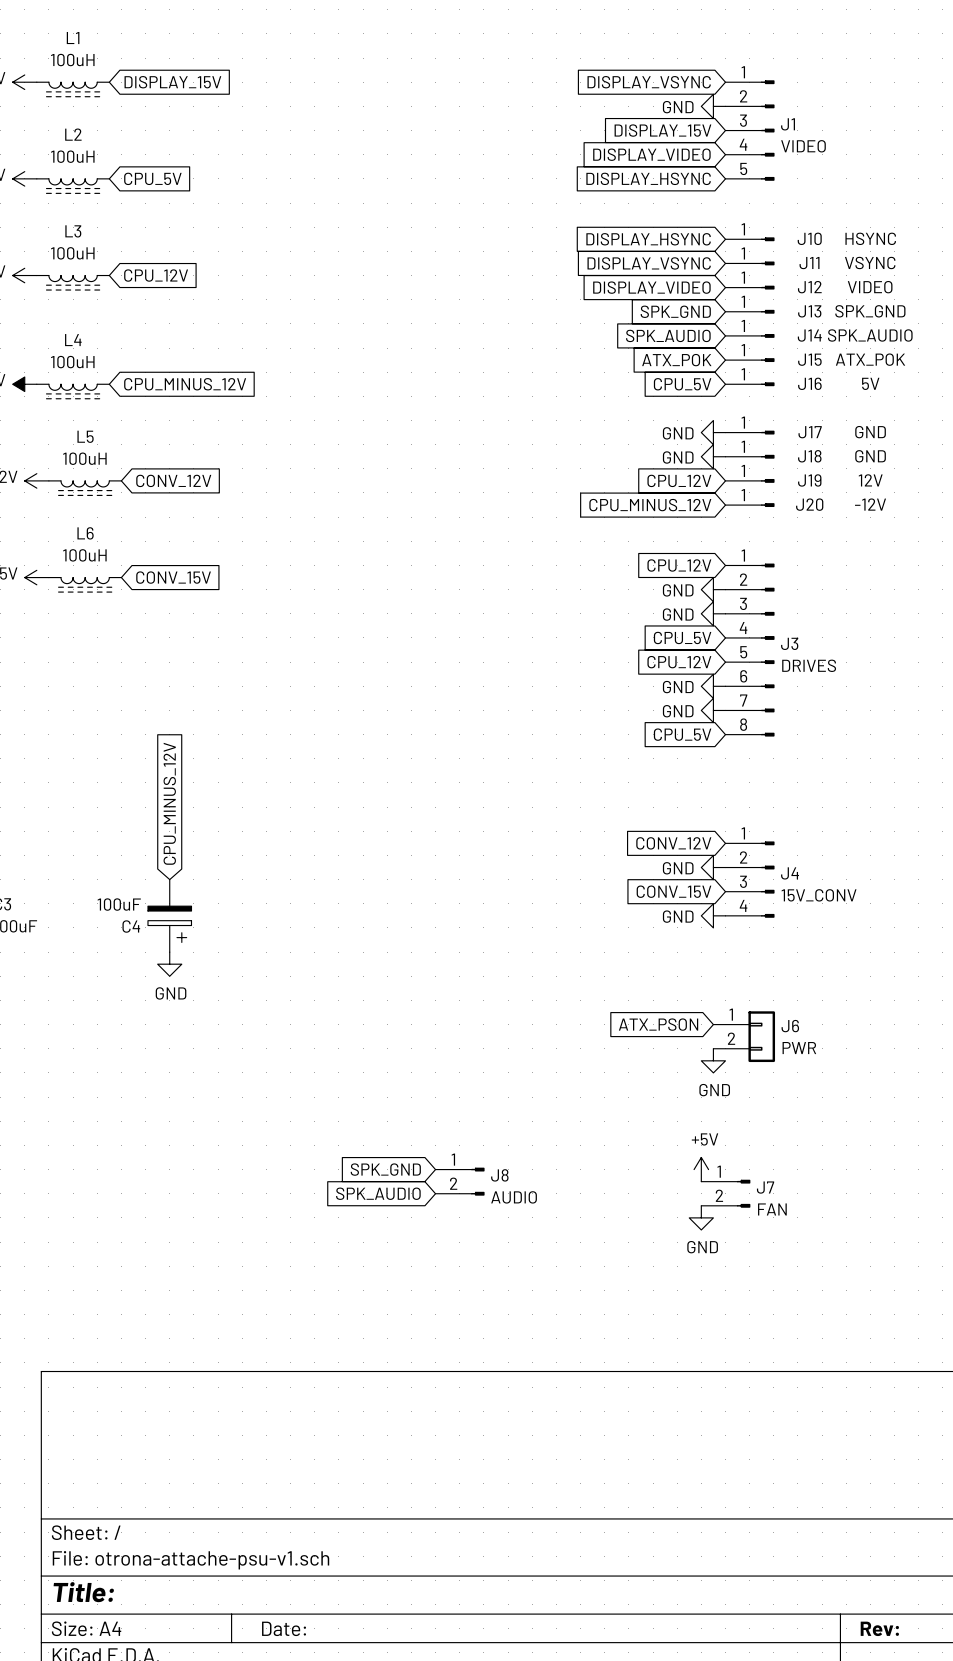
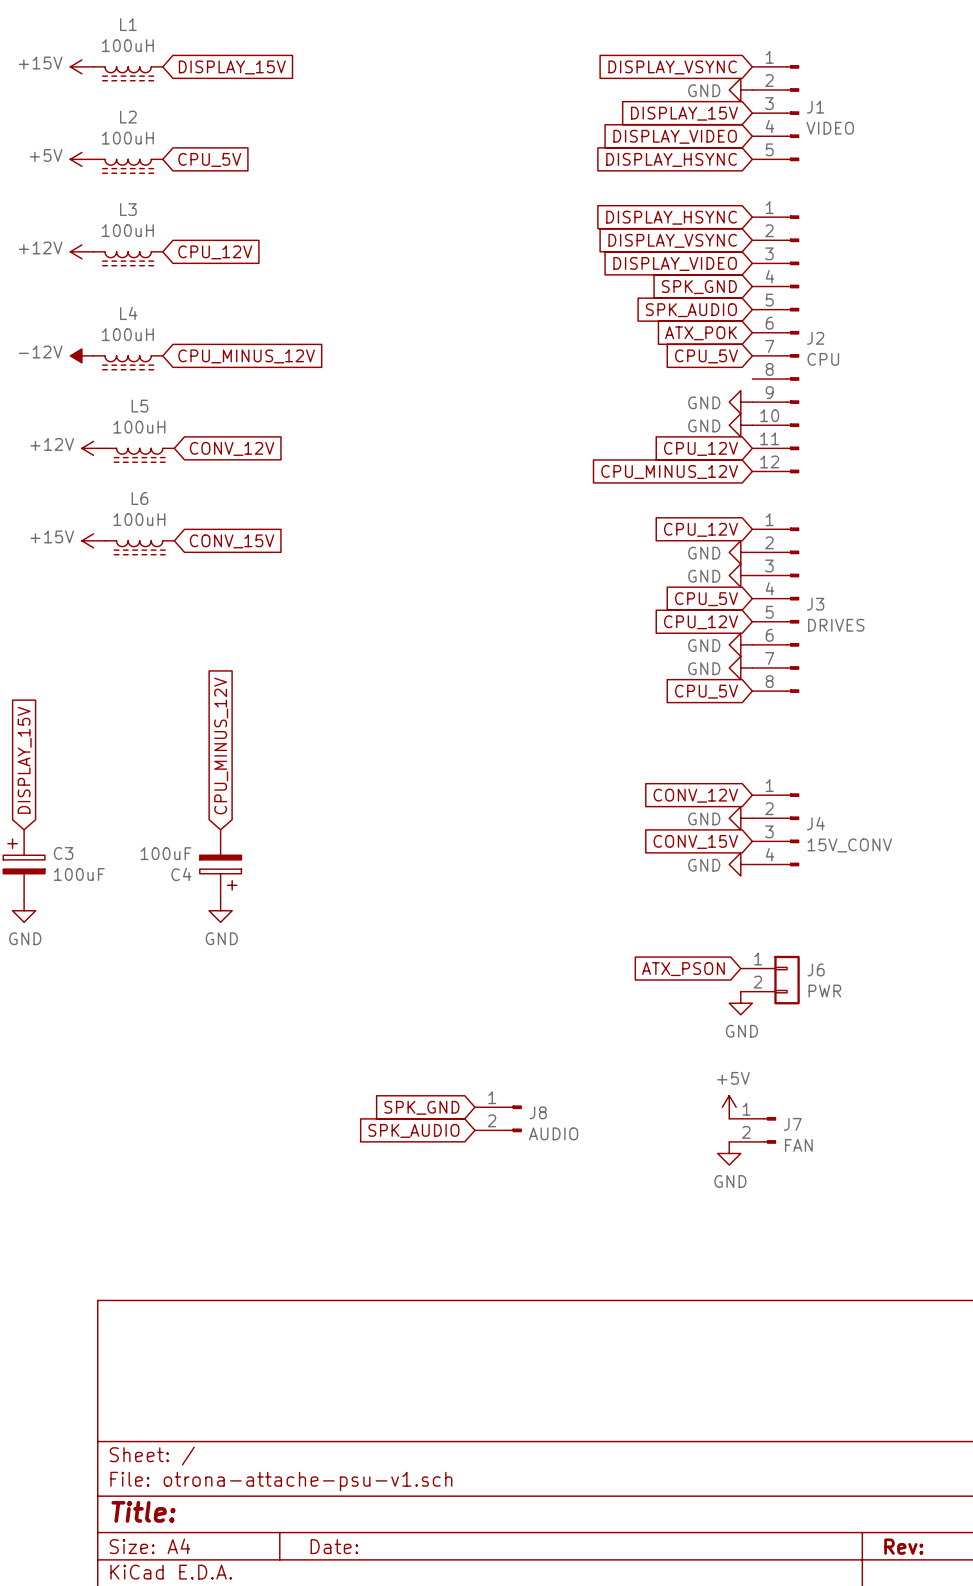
J10: HSYNC (750, 239) -> none
J11: VSYNC (750, 263) -> none
J12: VIDEO (750, 287) -> none
J13: SPK_GND (750, 311) -> none
J14: SPK_AUDIO (750, 335) -> none
J15: ATX_POK (750, 360) -> none
J2: none -> CPU (775, 344)
J16: 5V (750, 384) -> none
J17: GND (750, 432) -> none
J18: GND (750, 456) -> none
J19: 12V (750, 480) -> none
J20: -12V (750, 505) -> none

